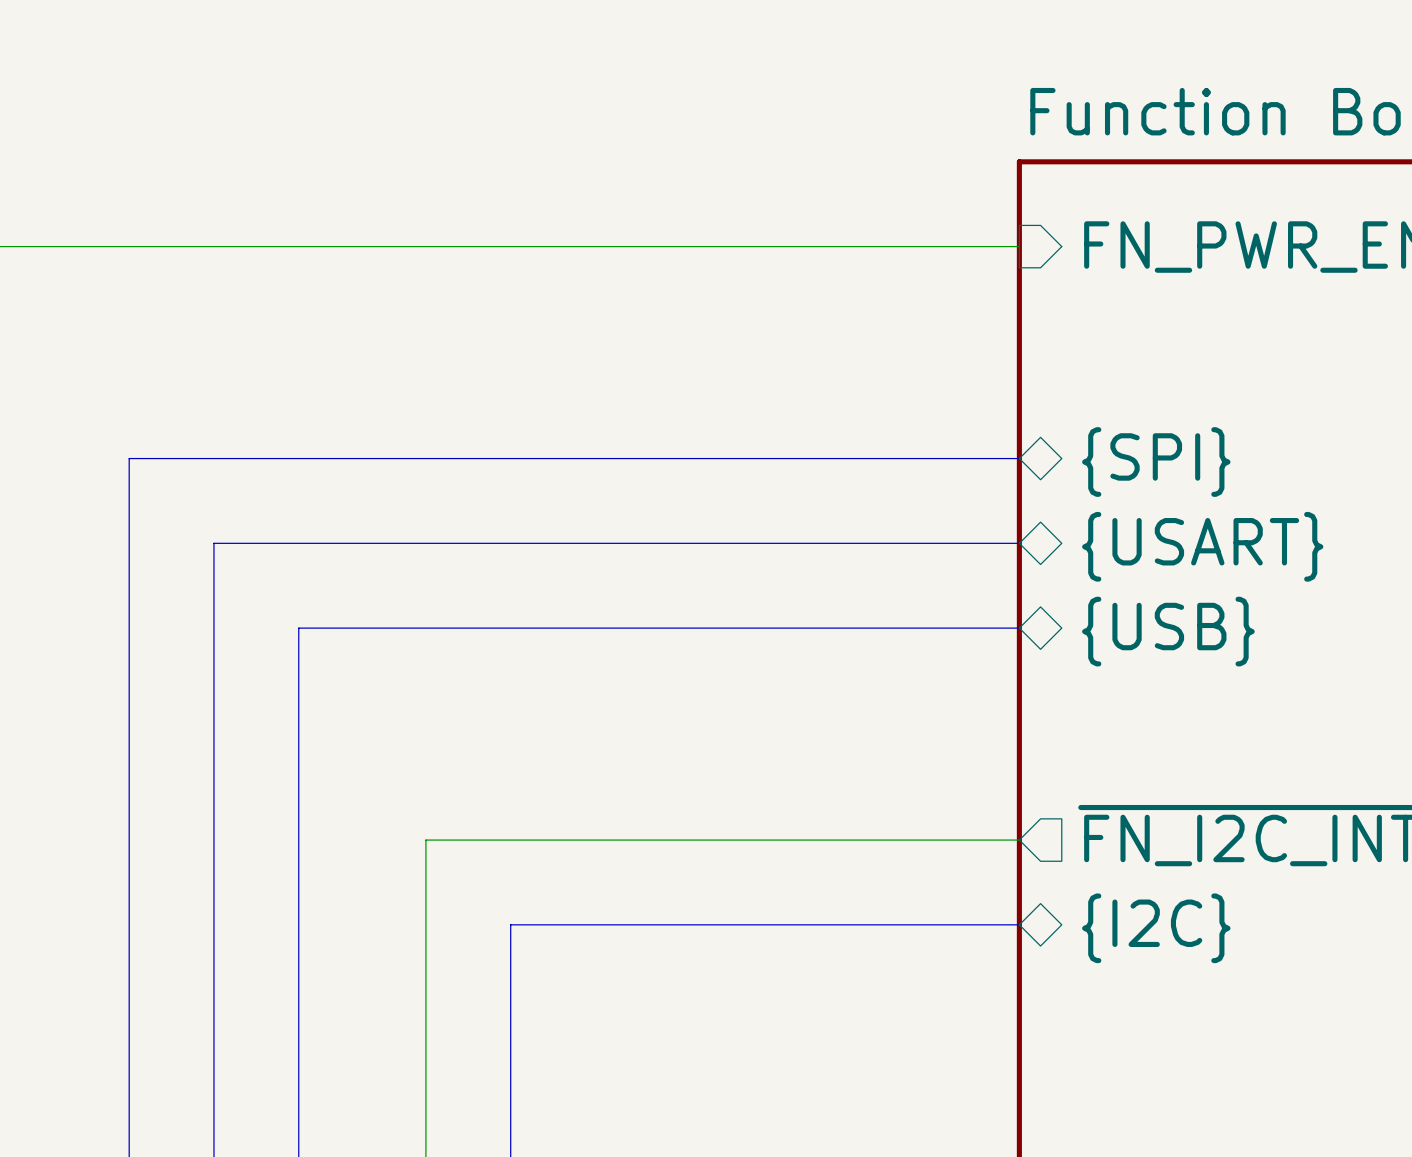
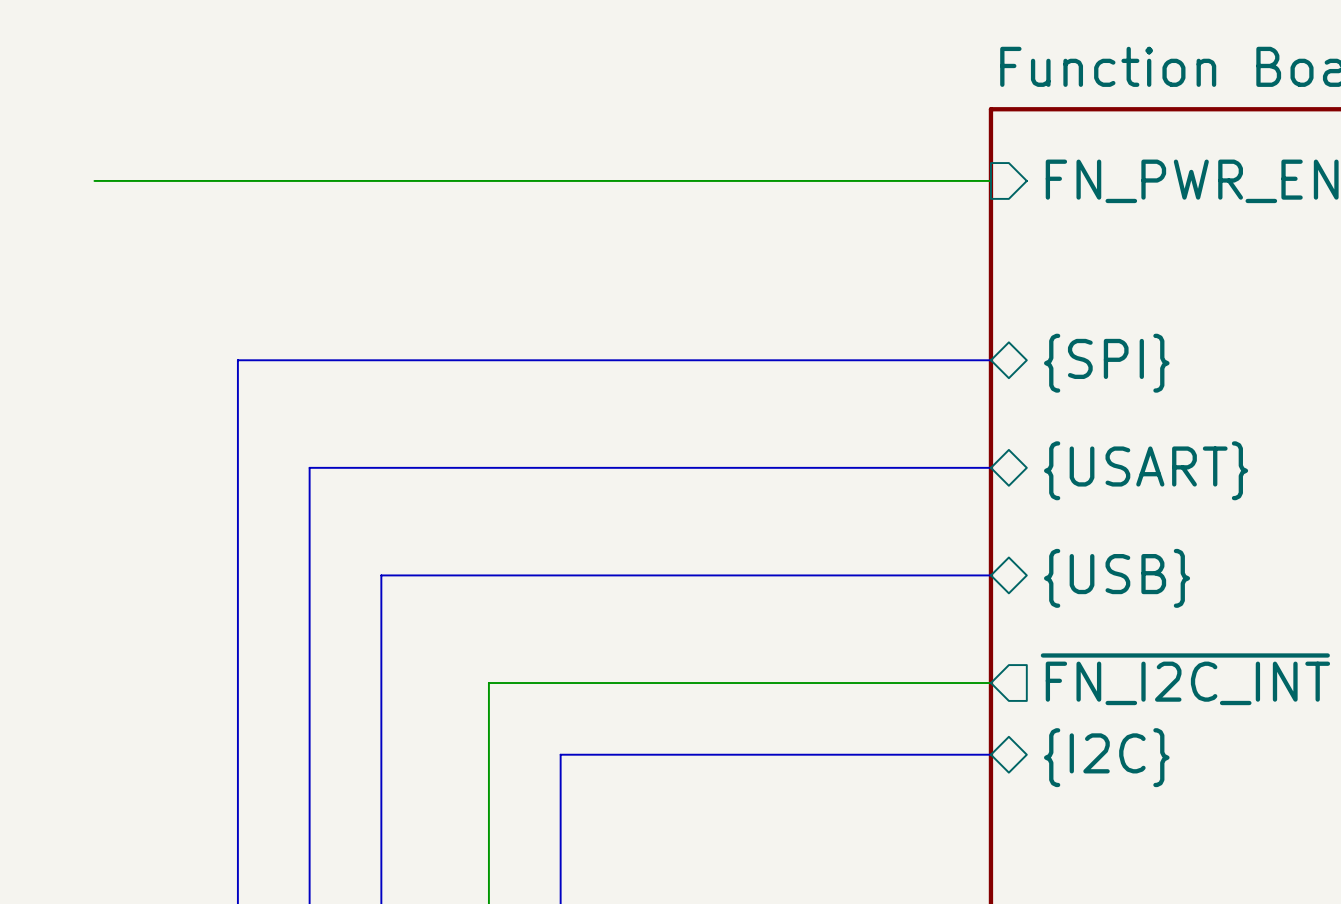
bus: (1019, 543) (213, 543) (213, 585) -> (990, 467) (309, 467)
sheet pin position: {USART} (1202, 546) -> {USART} (1146, 470)
bus: (1019, 628) (298, 628) (298, 712) -> (990, 575) (381, 575)
sheet pin position: {USB} (1168, 631) -> {USB} (1117, 578)

